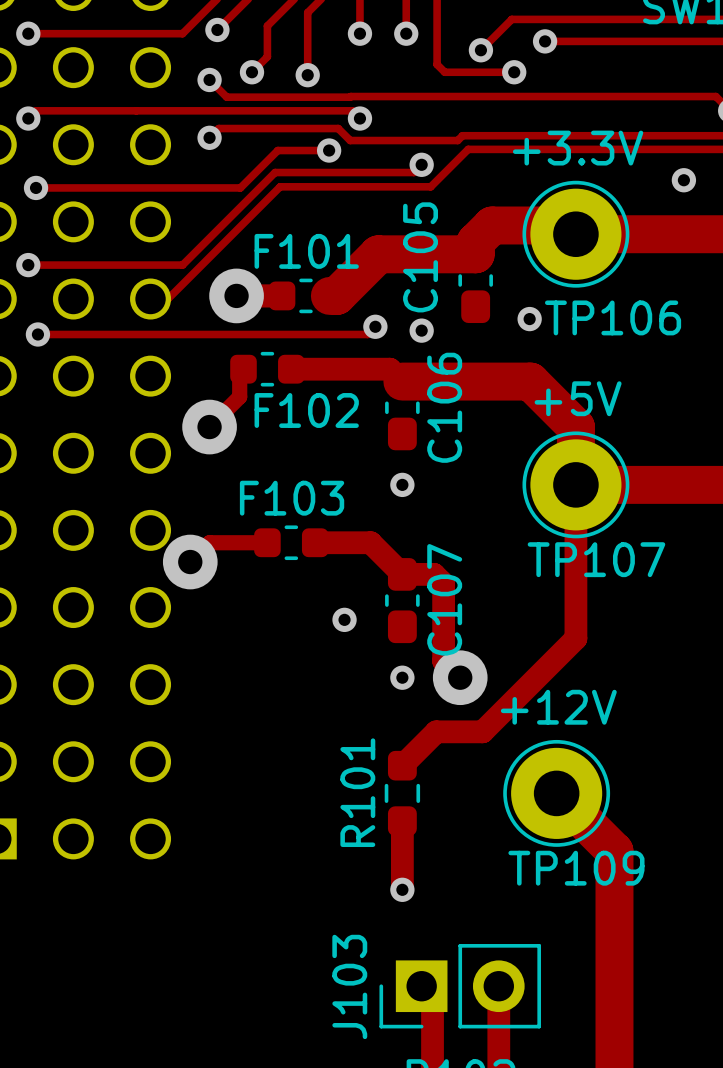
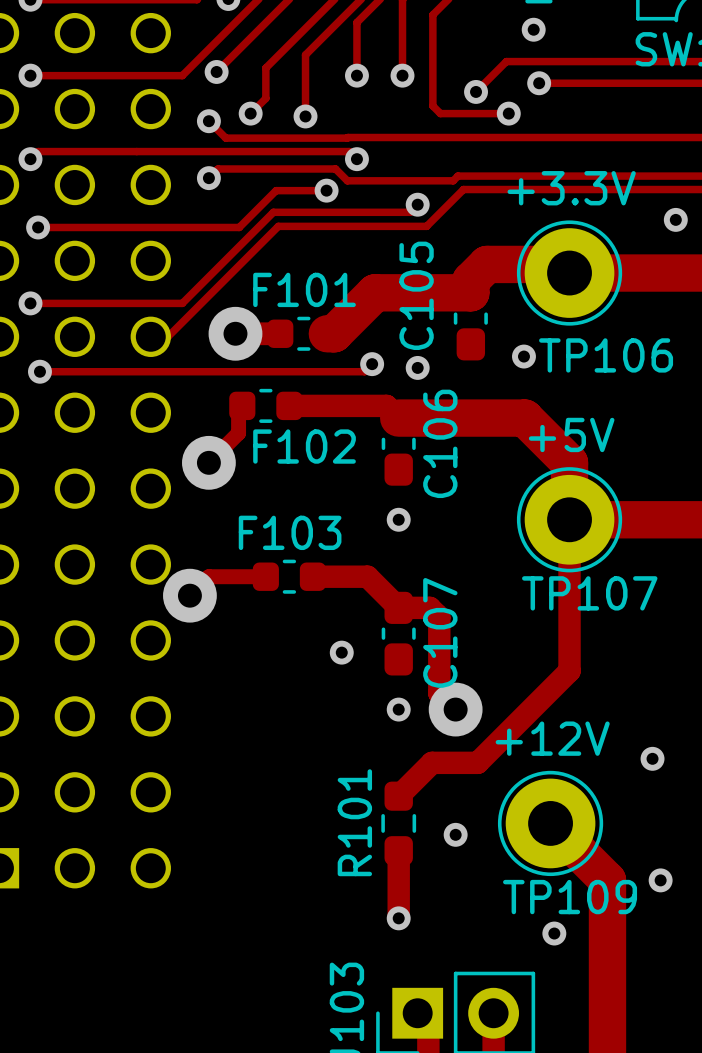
via: none -> (652, 758)
via: none -> (455, 834)
via: none -> (660, 880)
via: none -> (554, 933)

